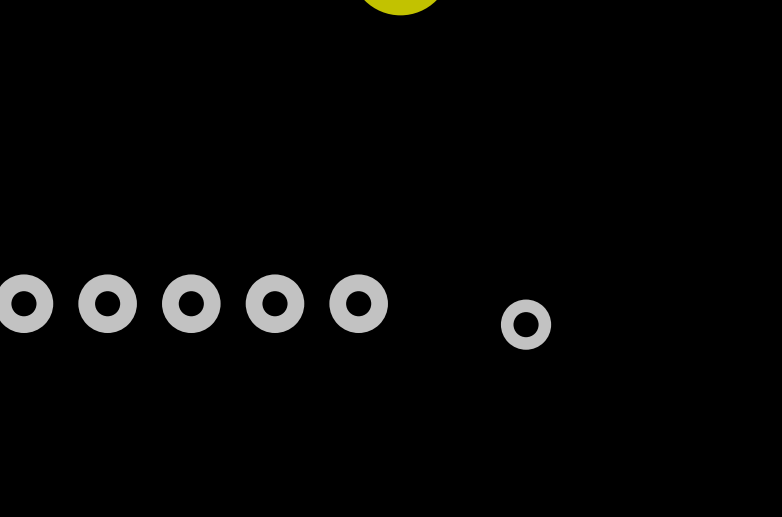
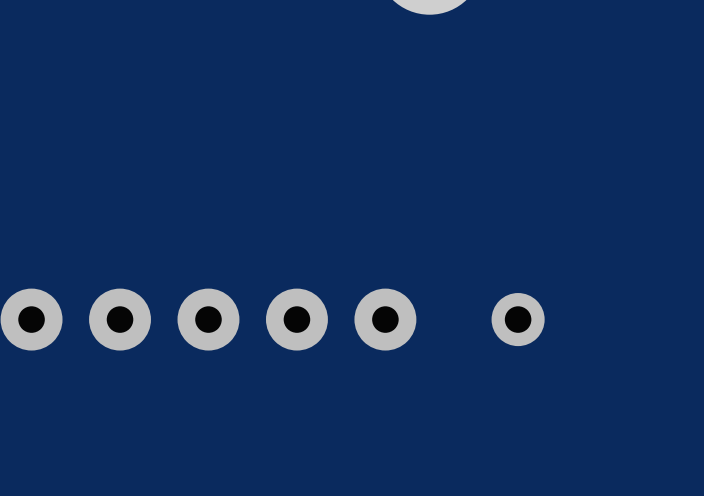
via position: (526, 324) -> (518, 319)

